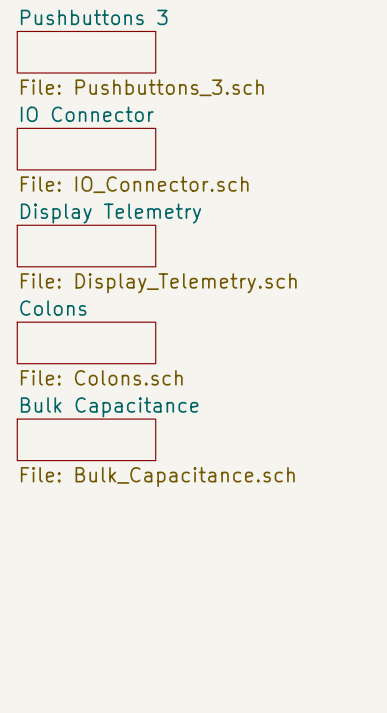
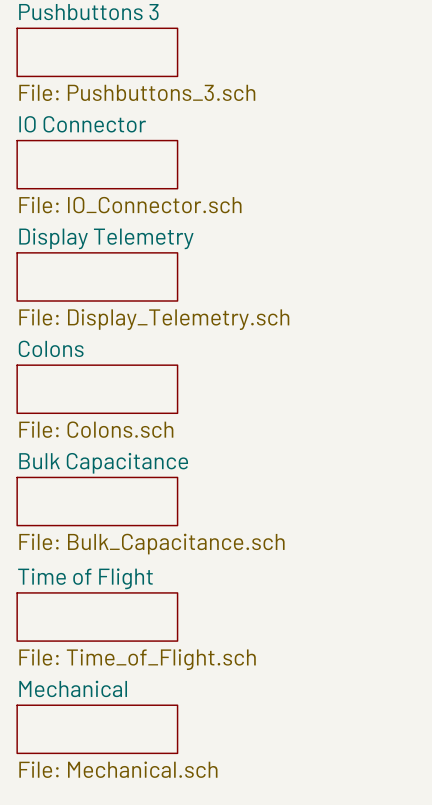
sheet Time of Flight: none -> File: Time_of_Flight.sch (97, 617)
sheet Mechanical: none -> File: Mechanical.sch (97, 729)

